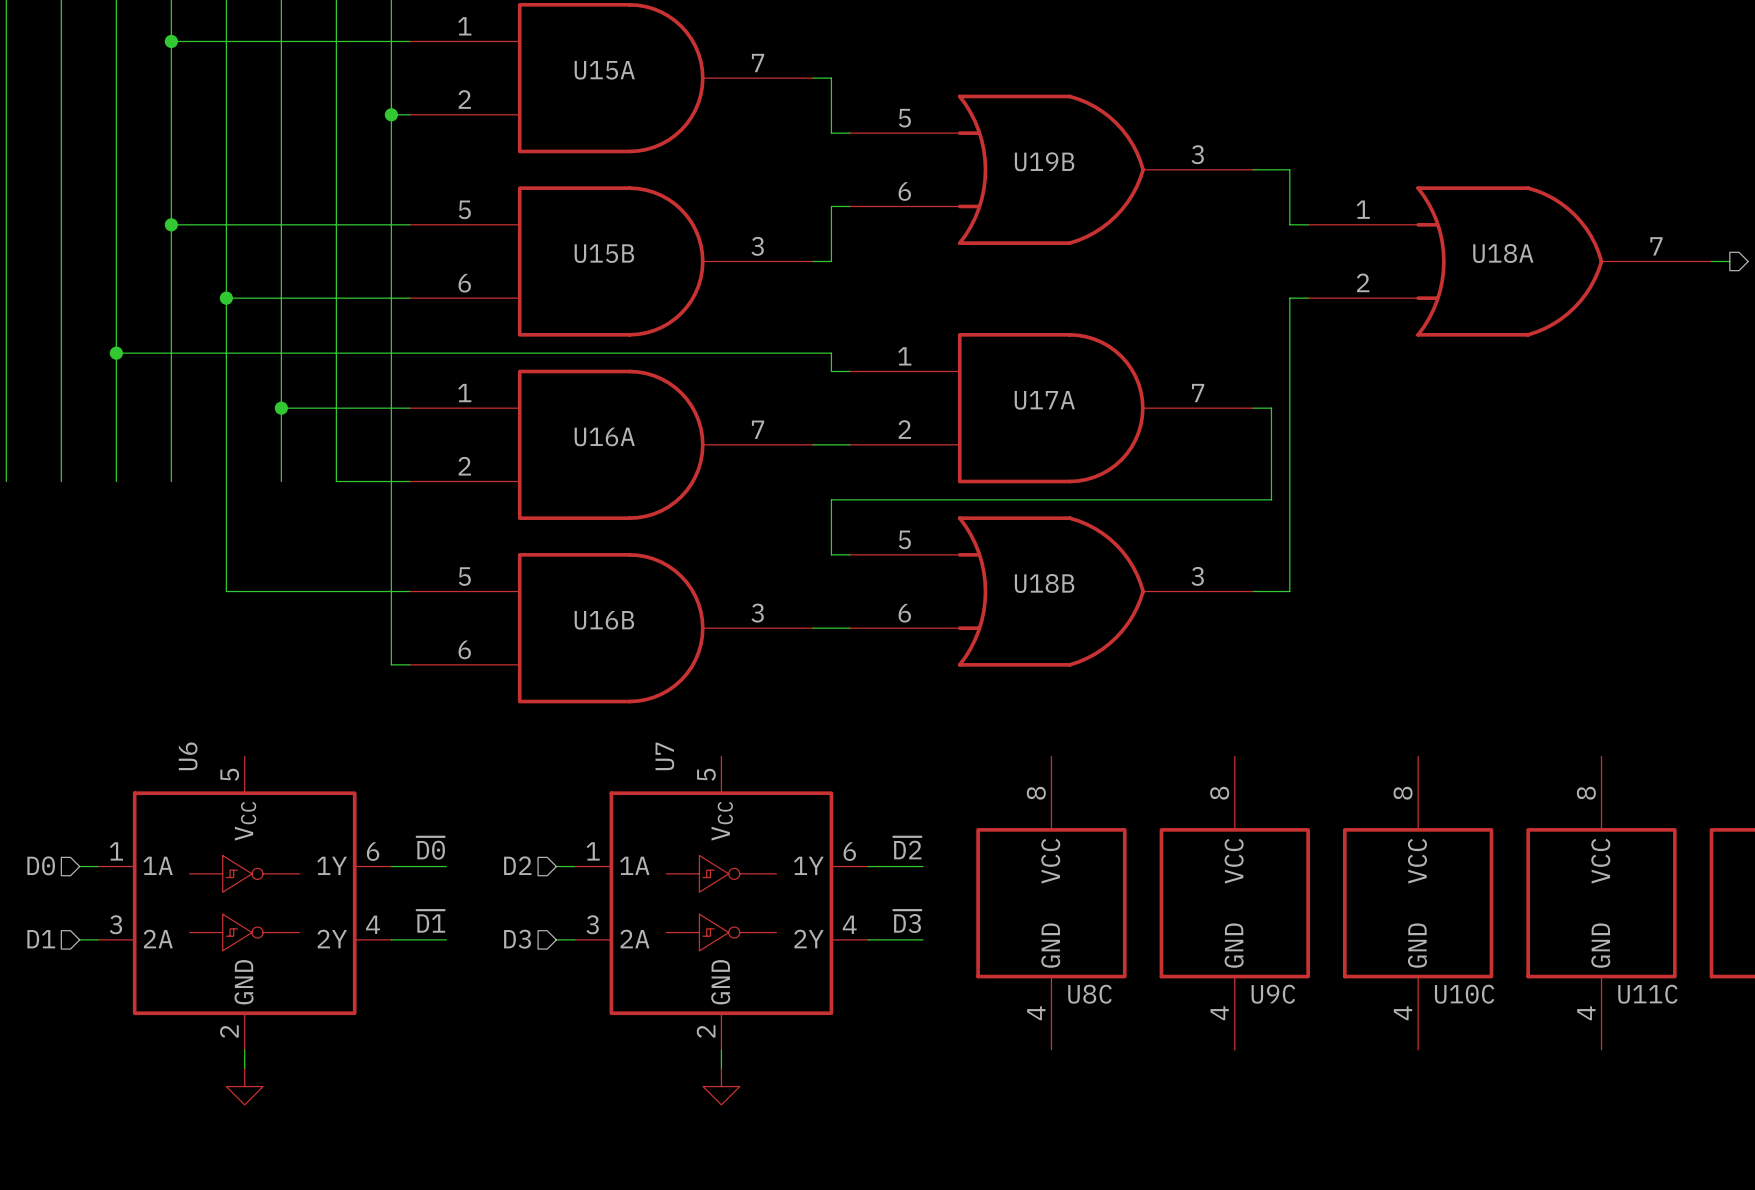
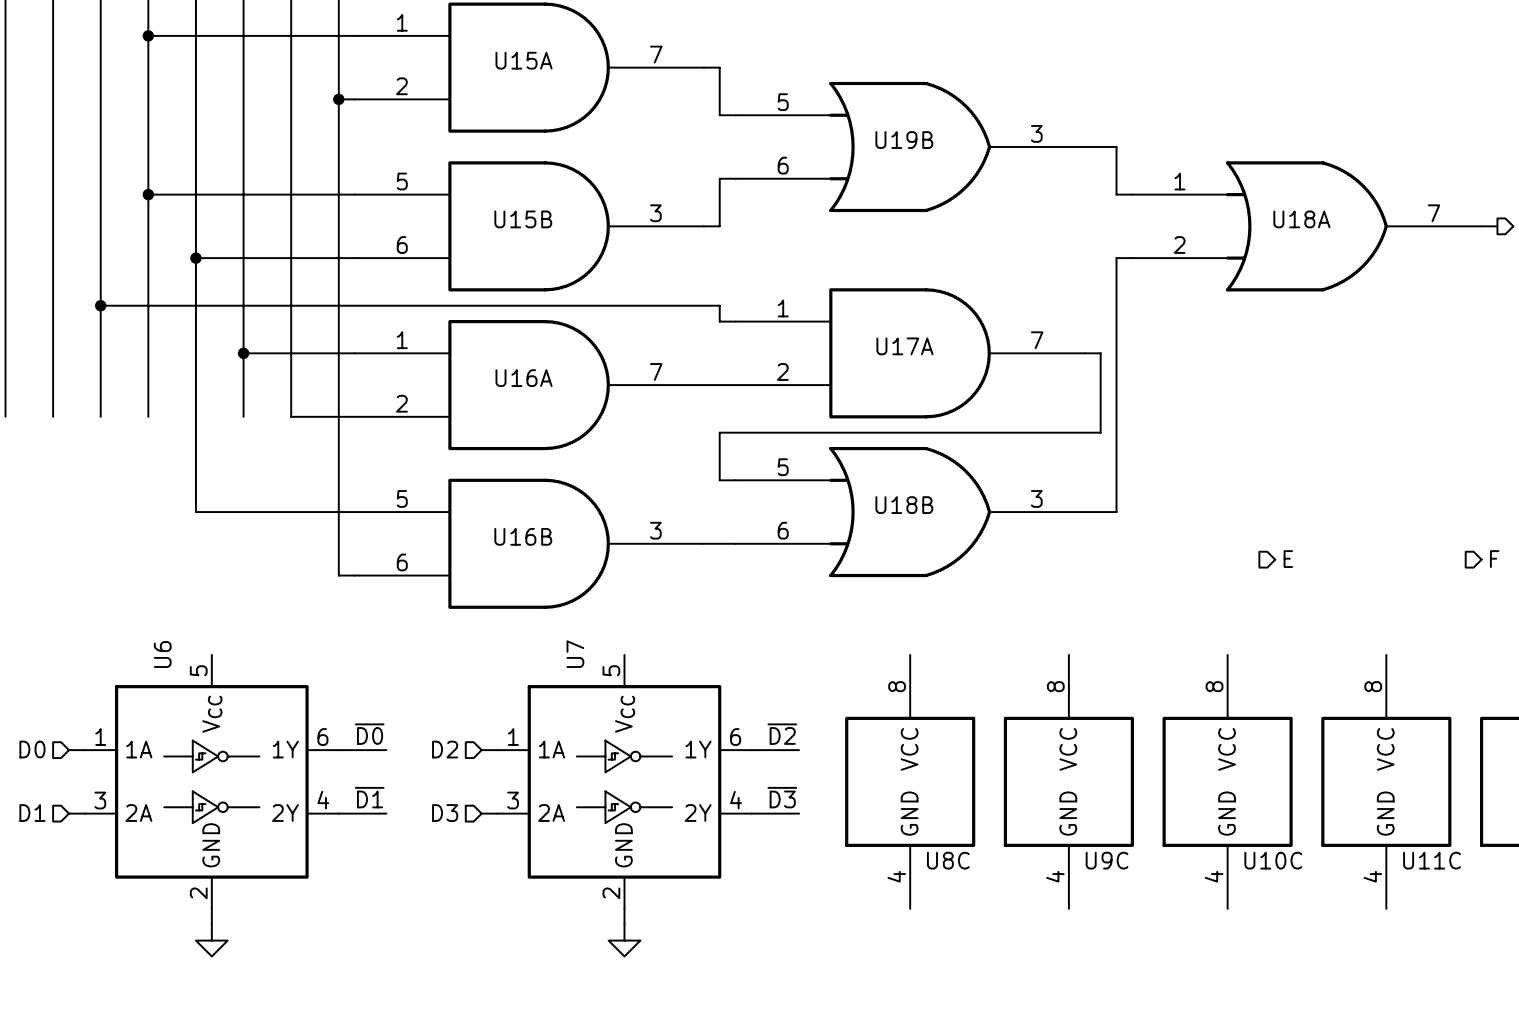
hierarchical label: none -> E (1288, 559)
hierarchical label: none -> F (1494, 559)

